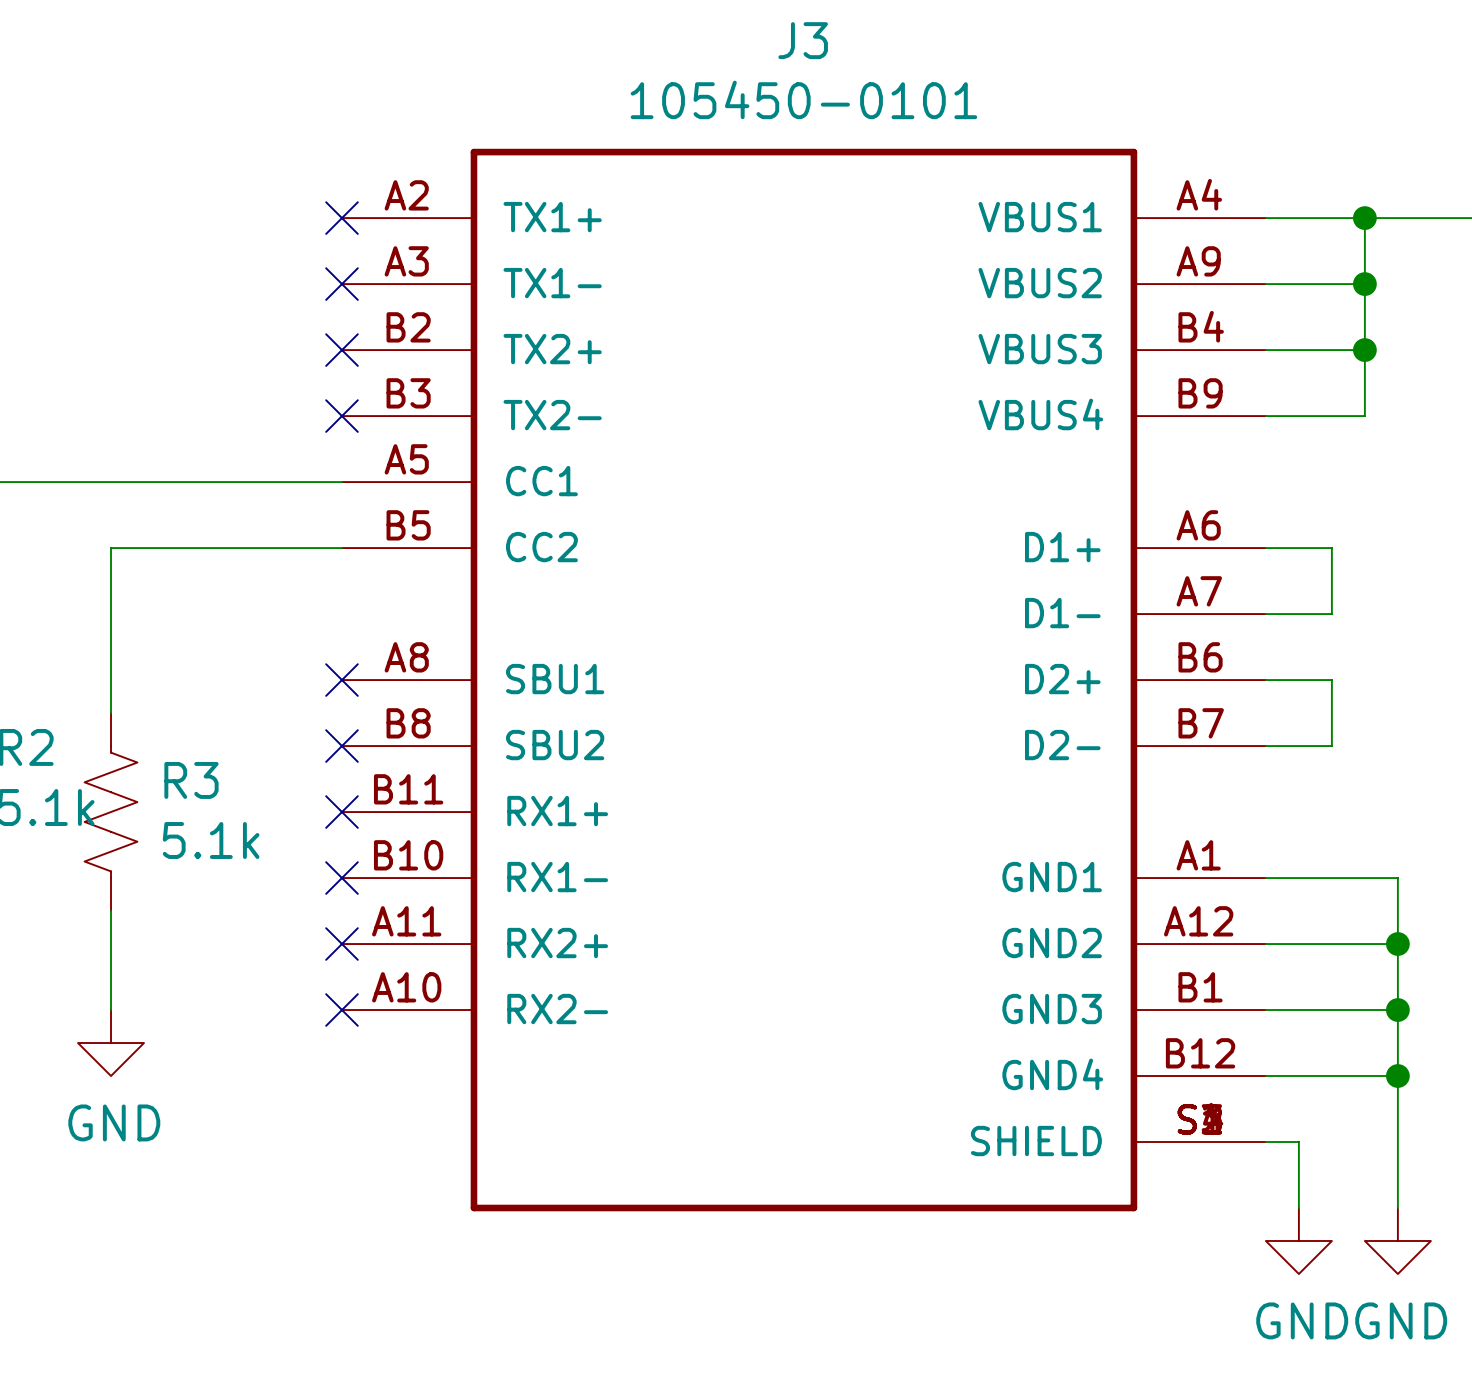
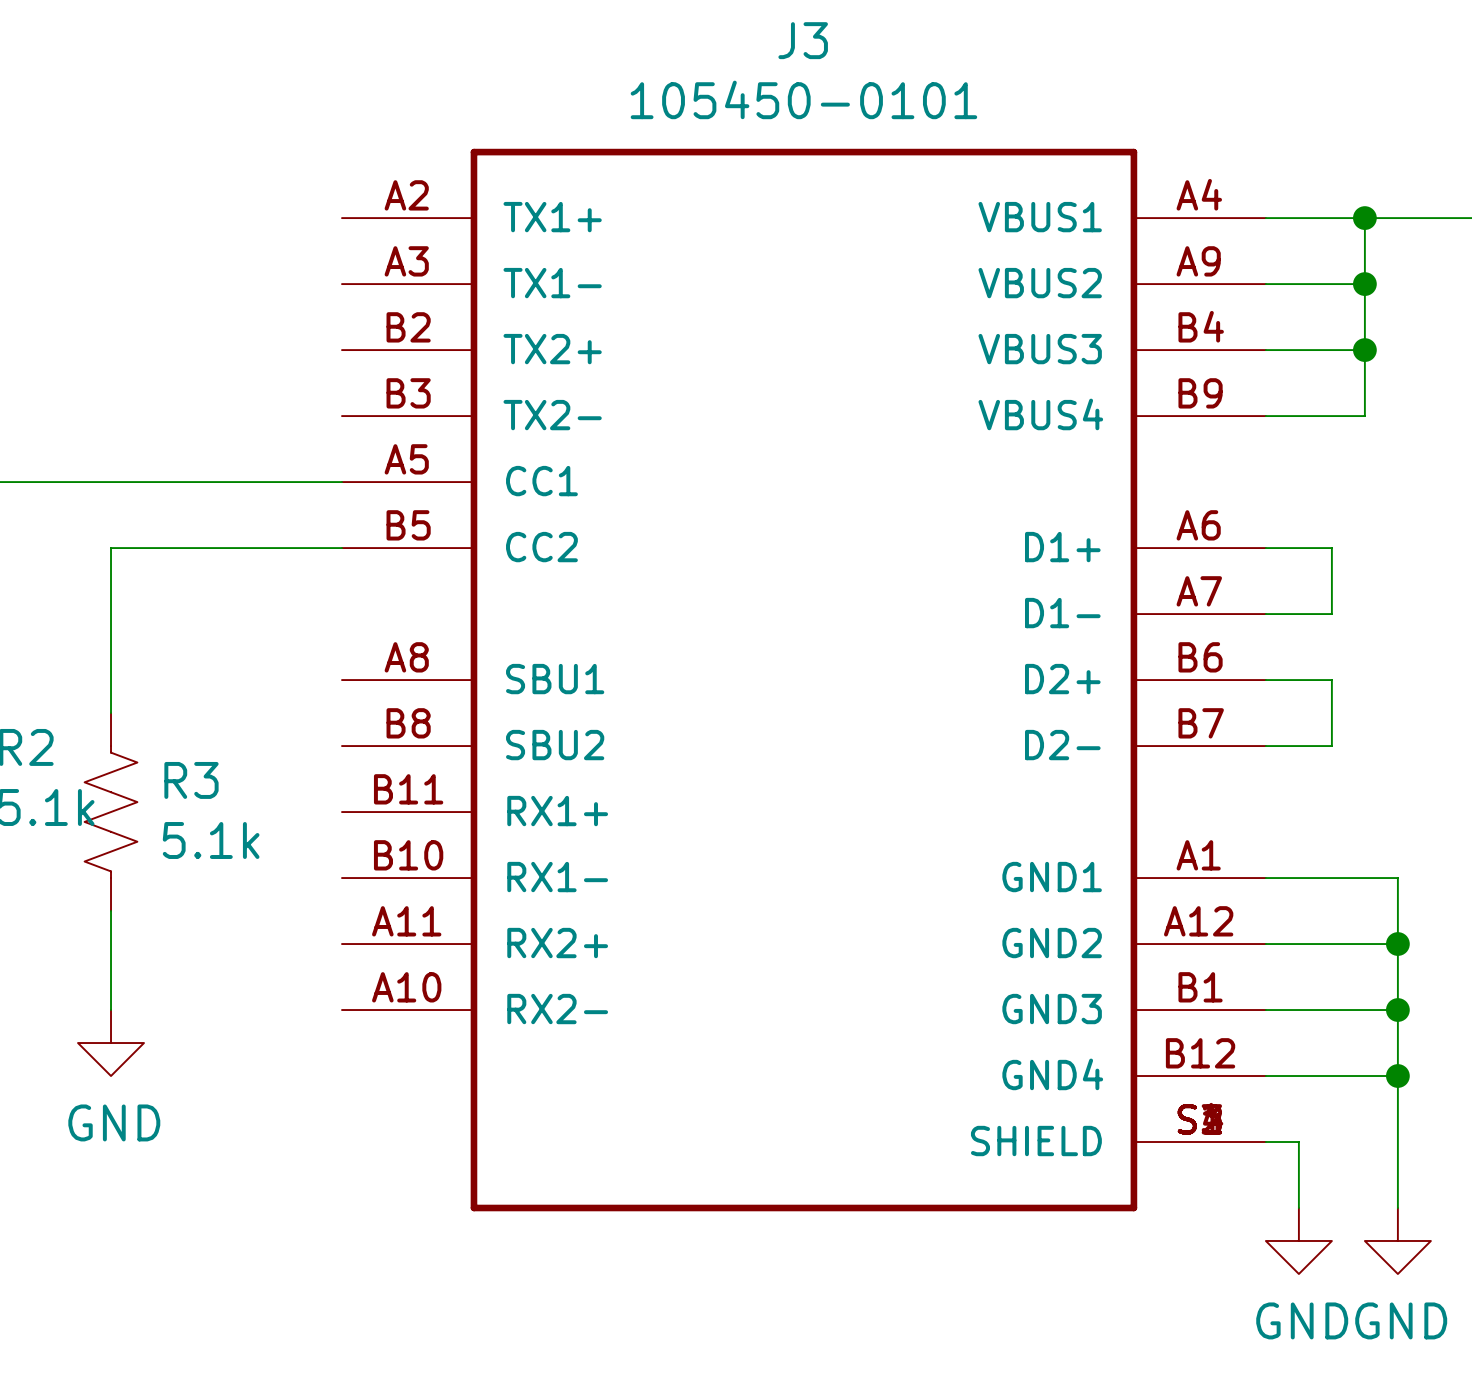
no-connect mark: (341, 218) -> none
no-connect mark: (341, 284) -> none
no-connect mark: (341, 350) -> none
no-connect mark: (341, 416) -> none
no-connect mark: (341, 680) -> none
no-connect mark: (341, 746) -> none
no-connect mark: (341, 812) -> none
no-connect mark: (341, 878) -> none
no-connect mark: (341, 944) -> none
no-connect mark: (341, 1010) -> none

